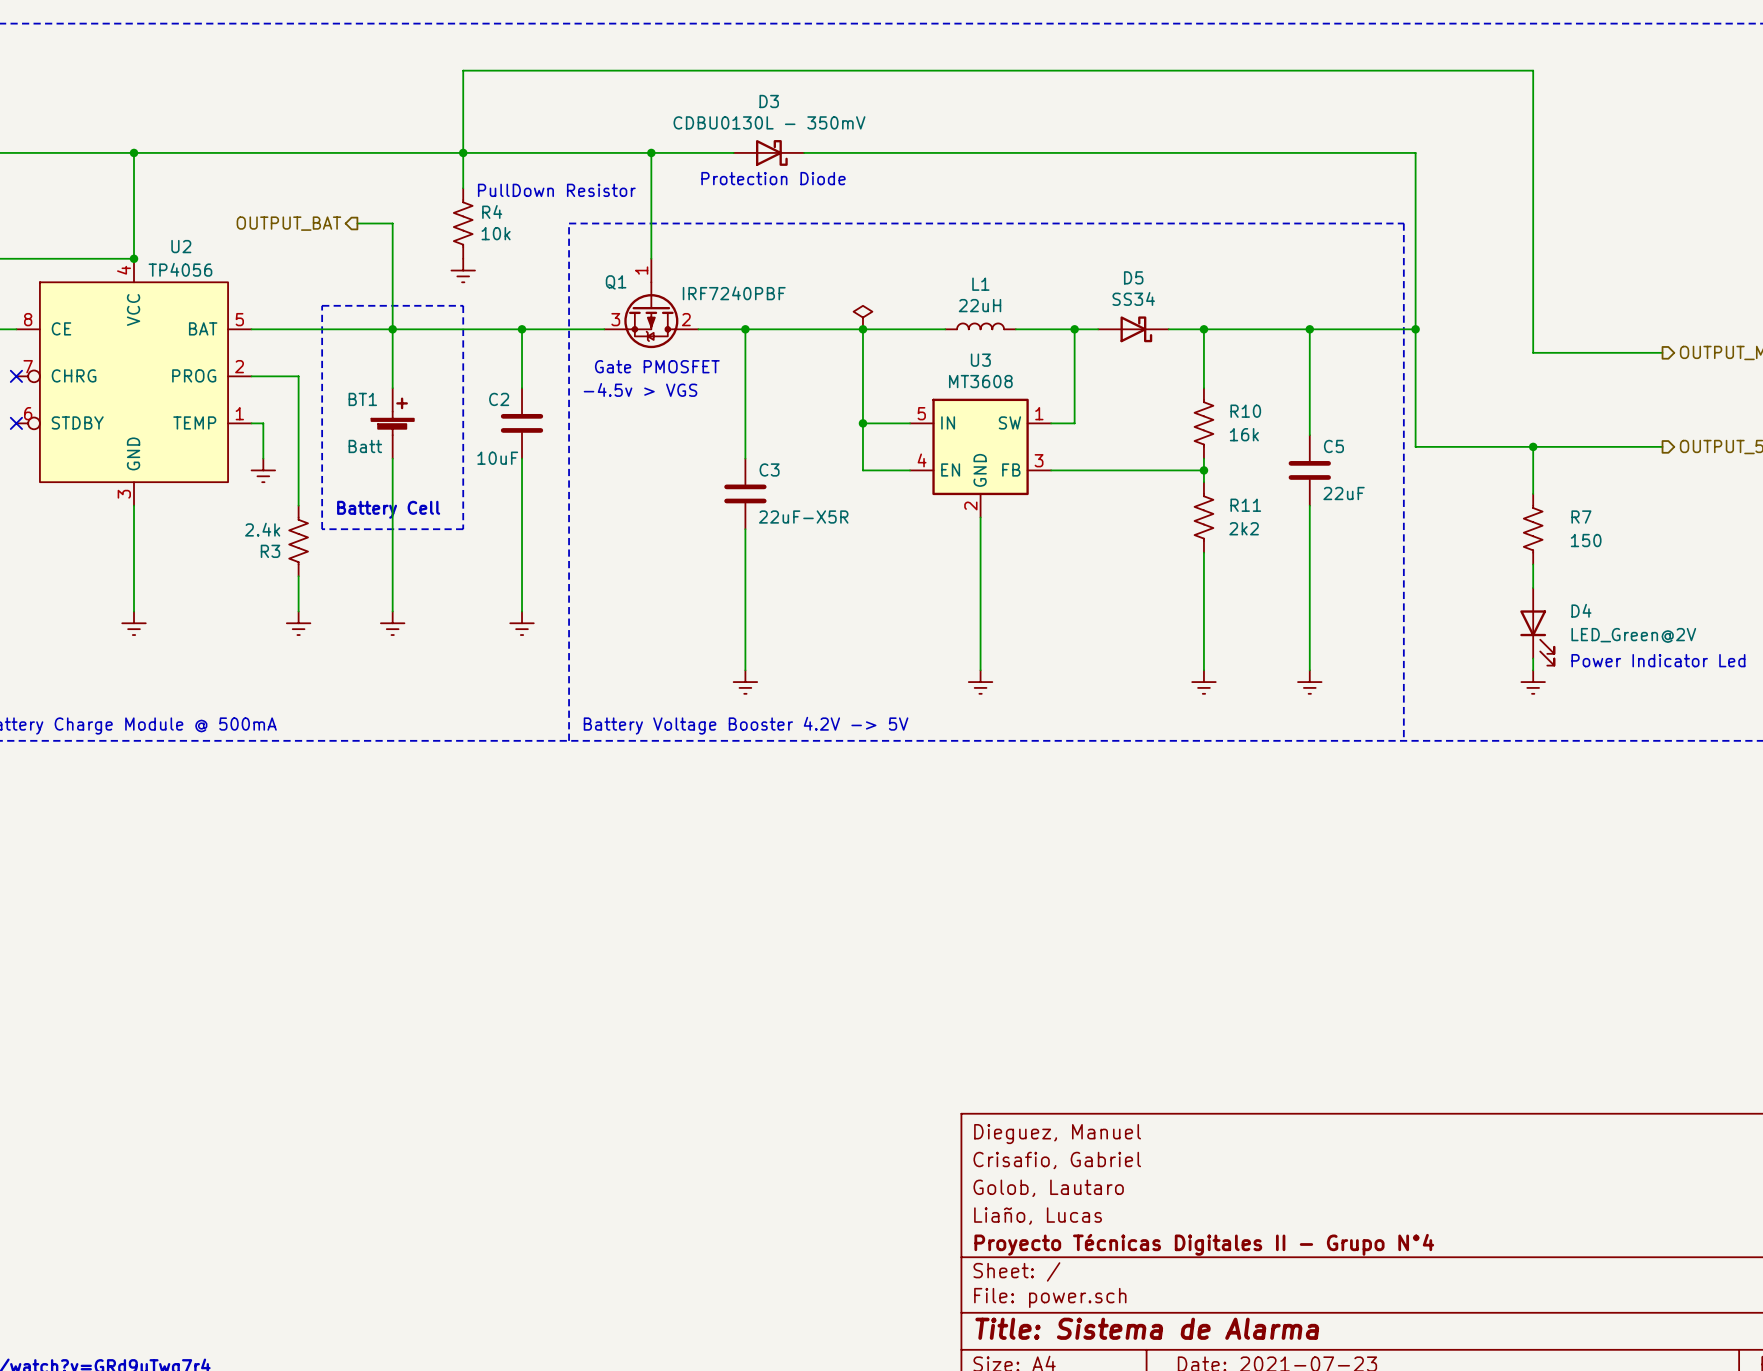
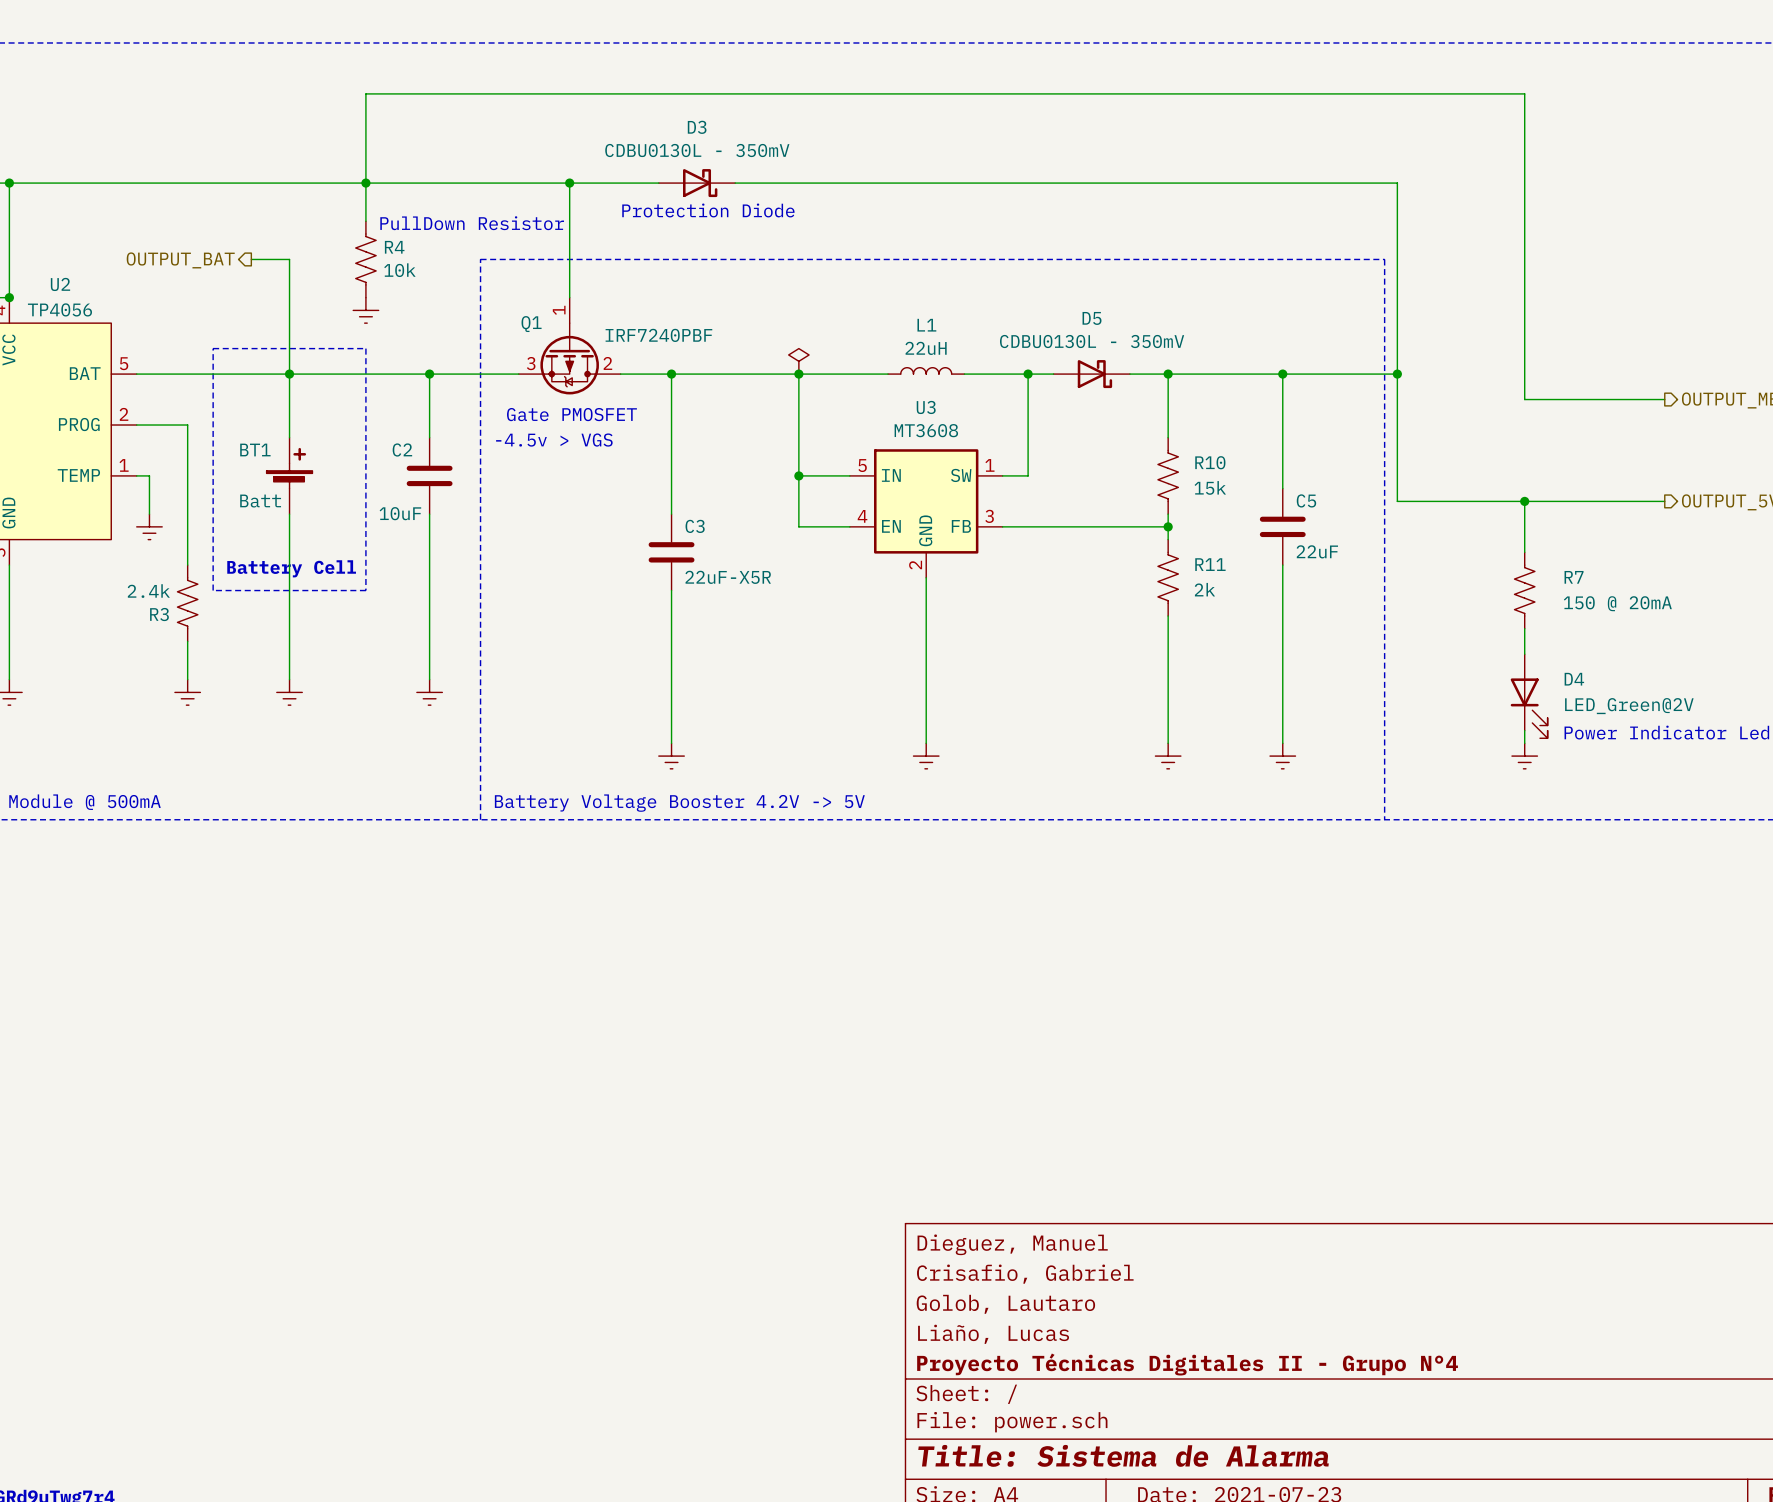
D5 value: SS34 (1133, 298) -> CDBU0130L - 350mV (1092, 341)
R10 value: 16k (1244, 434) -> 15k (1210, 487)
R11 value: 2k2 (1244, 528) -> 2k (1204, 589)
R7 value: 150 (1586, 540) -> 150 @ 20mA (1617, 603)

